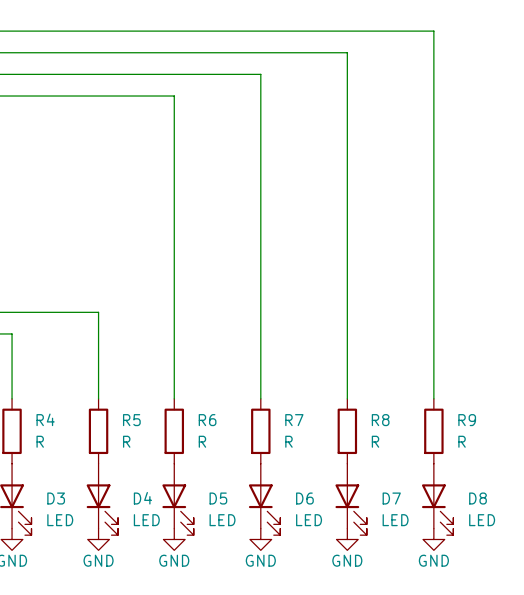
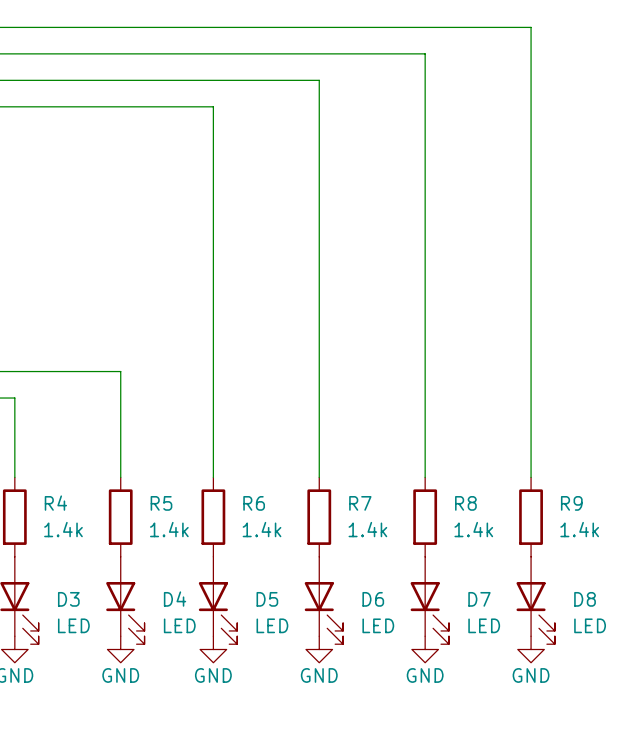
R4 value: R (40, 441) -> 1.4k (63, 529)
R5 value: R (126, 441) -> 1.4k (169, 529)
R6 value: R (202, 441) -> 1.4k (262, 529)
R7 value: R (288, 441) -> 1.4k (367, 529)
R8 value: R (375, 441) -> 1.4k (473, 529)
R9 value: R (462, 441) -> 1.4k (579, 529)

